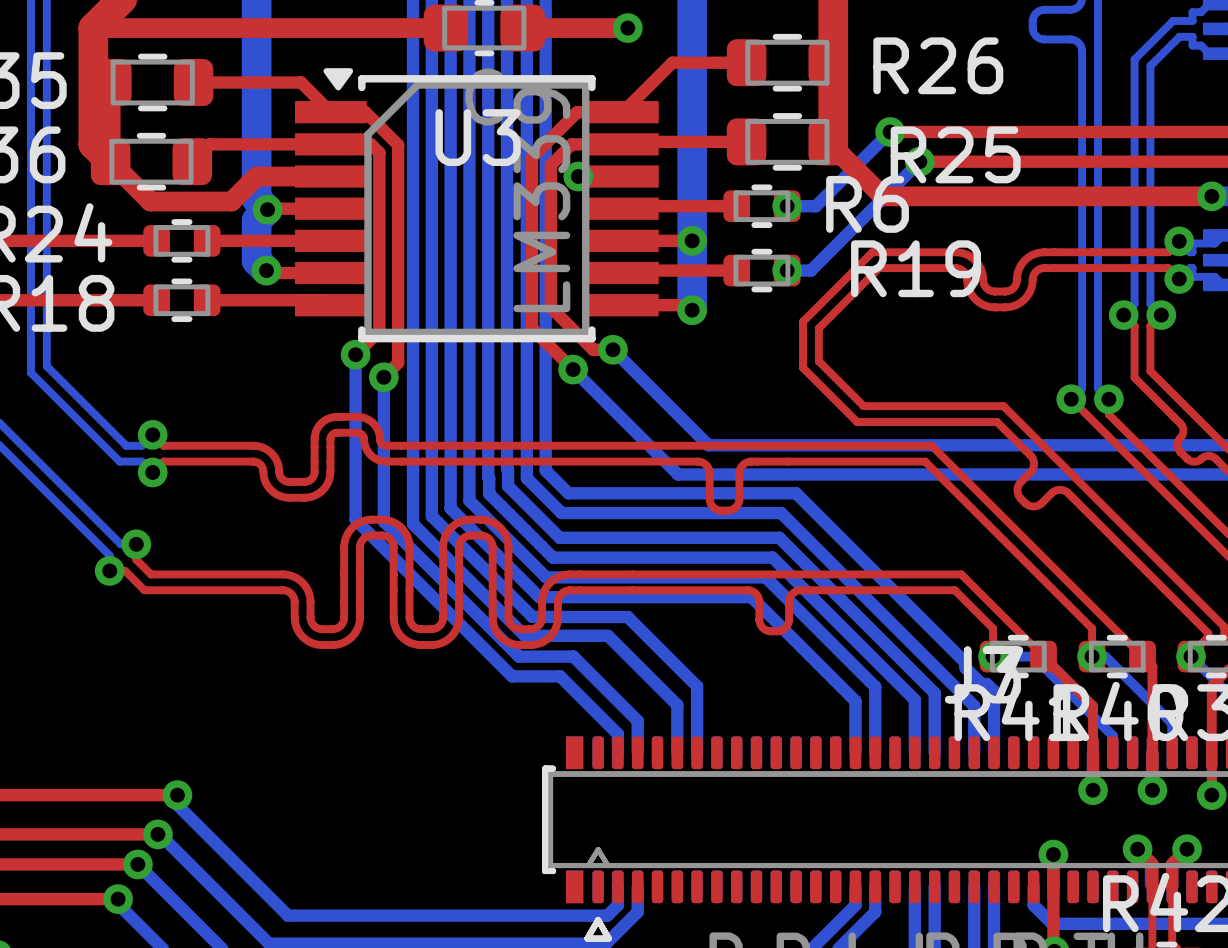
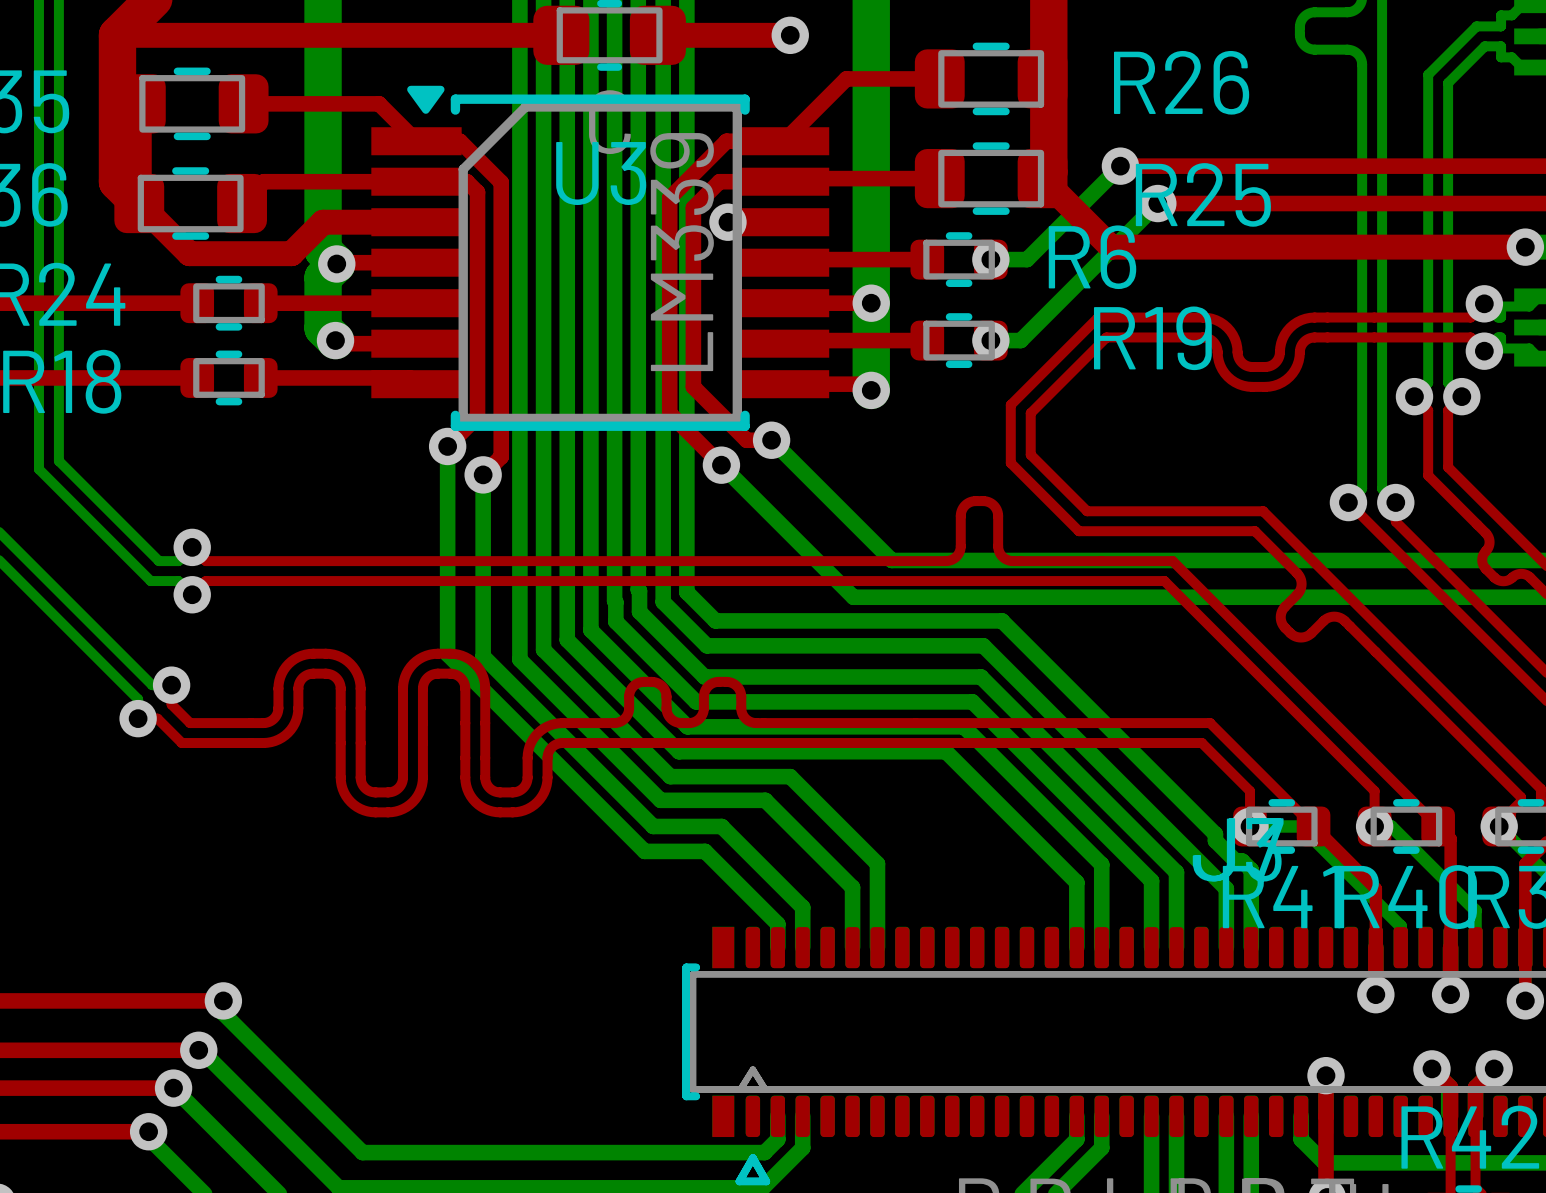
top track: (253, 445) (263, 447) (271, 453) (277, 461) (280, 477) (289, 481) (306, 481) (313, 477) (315, 434) (319, 425) (329, 418) (357, 416) (367, 419) (376, 427) (381, 443) (386, 445) -> (318, 561) (486, 561)
top track: (751, 445) (804, 445) -> (945, 561) (953, 558) (959, 551) (962, 509) (967, 503) (975, 501) (988, 501) (995, 508) (998, 514) (998, 551) (1003, 557) (1013, 561)
top track: (253, 461) (261, 466) (265, 481) (271, 490) (279, 495) (289, 497) (311, 496) (325, 487) (330, 475) (330, 438) (334, 433) (360, 433) (370, 455) (379, 460) (386, 461) -> (318, 581) (486, 581)
top track: (697, 461) (704, 463) (709, 469) (710, 503) (715, 508) (721, 510) (731, 510) (737, 505) (740, 469) (743, 464) (751, 461) -> (878, 581) (945, 581)
top track: (209, 574) (282, 574) (294, 577) (304, 584) (308, 593) (311, 622) (316, 627) (322, 629) (336, 628) (343, 621) (344, 541) (352, 527) (365, 520) (390, 521) (401, 527) (406, 535) (409, 547) (409, 618) (412, 625) (418, 628) (435, 628) (442, 621) (443, 541) (449, 530) (461, 521) (470, 519) (489, 521) (498, 525) (505, 535) (508, 547) (508, 618) (511, 624) (516, 628) (531, 629) (539, 624) (542, 618) (543, 593) (548, 584) (555, 578) (566, 574) (600, 574) -> (263, 723) (271, 720) (277, 713) (279, 680) (286, 666) (298, 657) (313, 653) (329, 653) (340, 657) (350, 663) (357, 673) (360, 688) (360, 779) (365, 788) (373, 792) (392, 791) (402, 782) (403, 680) (413, 663) (430, 654) (450, 653) (461, 655) (475, 663) (481, 673) (485, 688) (485, 779) (489, 788) (496, 792) (515, 792) (524, 786) (527, 779) (529, 746) (540, 730) (558, 723) (620, 721) (628, 713) (630, 690) (640, 682) (654, 682) (662, 686) (666, 693) (668, 714) (673, 720) (681, 723) (693, 722) (700, 717) (703, 709) (704, 693) (709, 685) (717, 681) (731, 682) (740, 691) (743, 716) (749, 721) (756, 723)
top track: (209, 590) (287, 591) (294, 599) (294, 620) (298, 632) (307, 640) (322, 645) (344, 642) (351, 636) (357, 629) (360, 617) (360, 546) (363, 538) (369, 535) (384, 535) (392, 542) (394, 623) (401, 636) (415, 644) (440, 643) (450, 636) (456, 629) (459, 617) (459, 546) (461, 539) (466, 536) (484, 536) (491, 543) (492, 620) (498, 634) (508, 642) (517, 644) (533, 644) (547, 639) (553, 632) (557, 623) (559, 597) (563, 592) (569, 590) -> (263, 743) (278, 739) (290, 729) (297, 715) (299, 683) (303, 676) (313, 673) (330, 674) (339, 683) (341, 785) (350, 802) (367, 811) (388, 812) (399, 810) (409, 804) (419, 792) (422, 777) (423, 686) (427, 678) (434, 674) (453, 674) (463, 682) (466, 785) (475, 802) (492, 811) (520, 811) (537, 802) (546, 785) (548, 753) (557, 743) (717, 743)
top track: (747, 590) (754, 592) (758, 598) (761, 625) (771, 631) (781, 630) (786, 626) (788, 620) (789, 598) (794, 592) (800, 590) -> (940, 743) (1008, 743)

